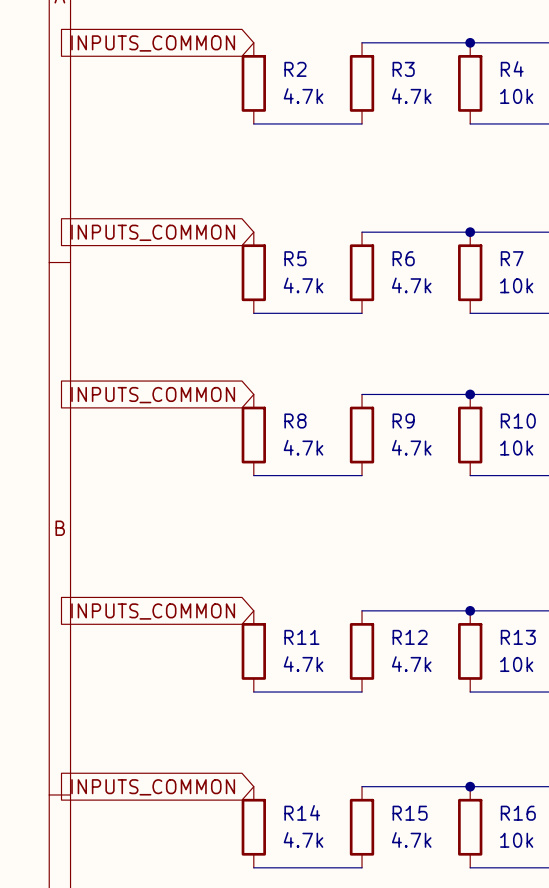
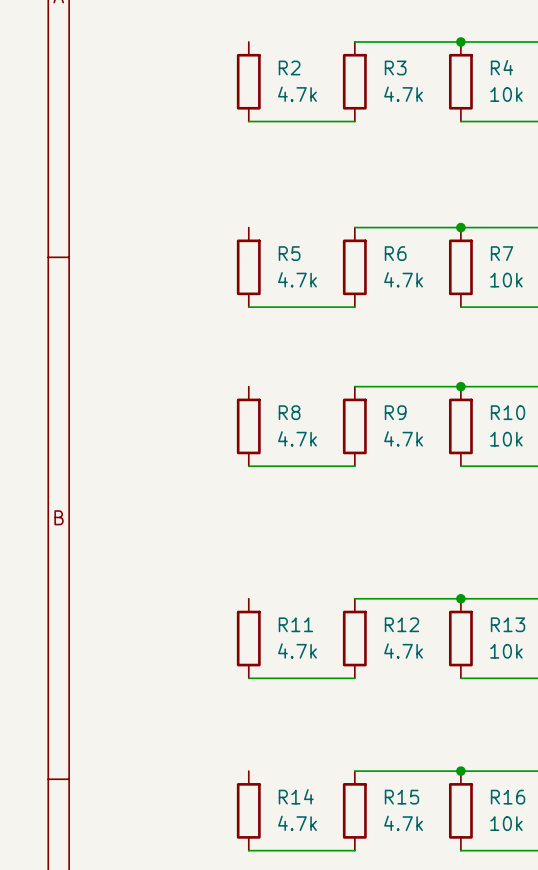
global label: INPUTS_COMMON (153, 43) -> none
global label: INPUTS_COMMON (153, 232) -> none
global label: INPUTS_COMMON (153, 395) -> none
global label: INPUTS_COMMON (153, 611) -> none
global label: INPUTS_COMMON (153, 787) -> none

